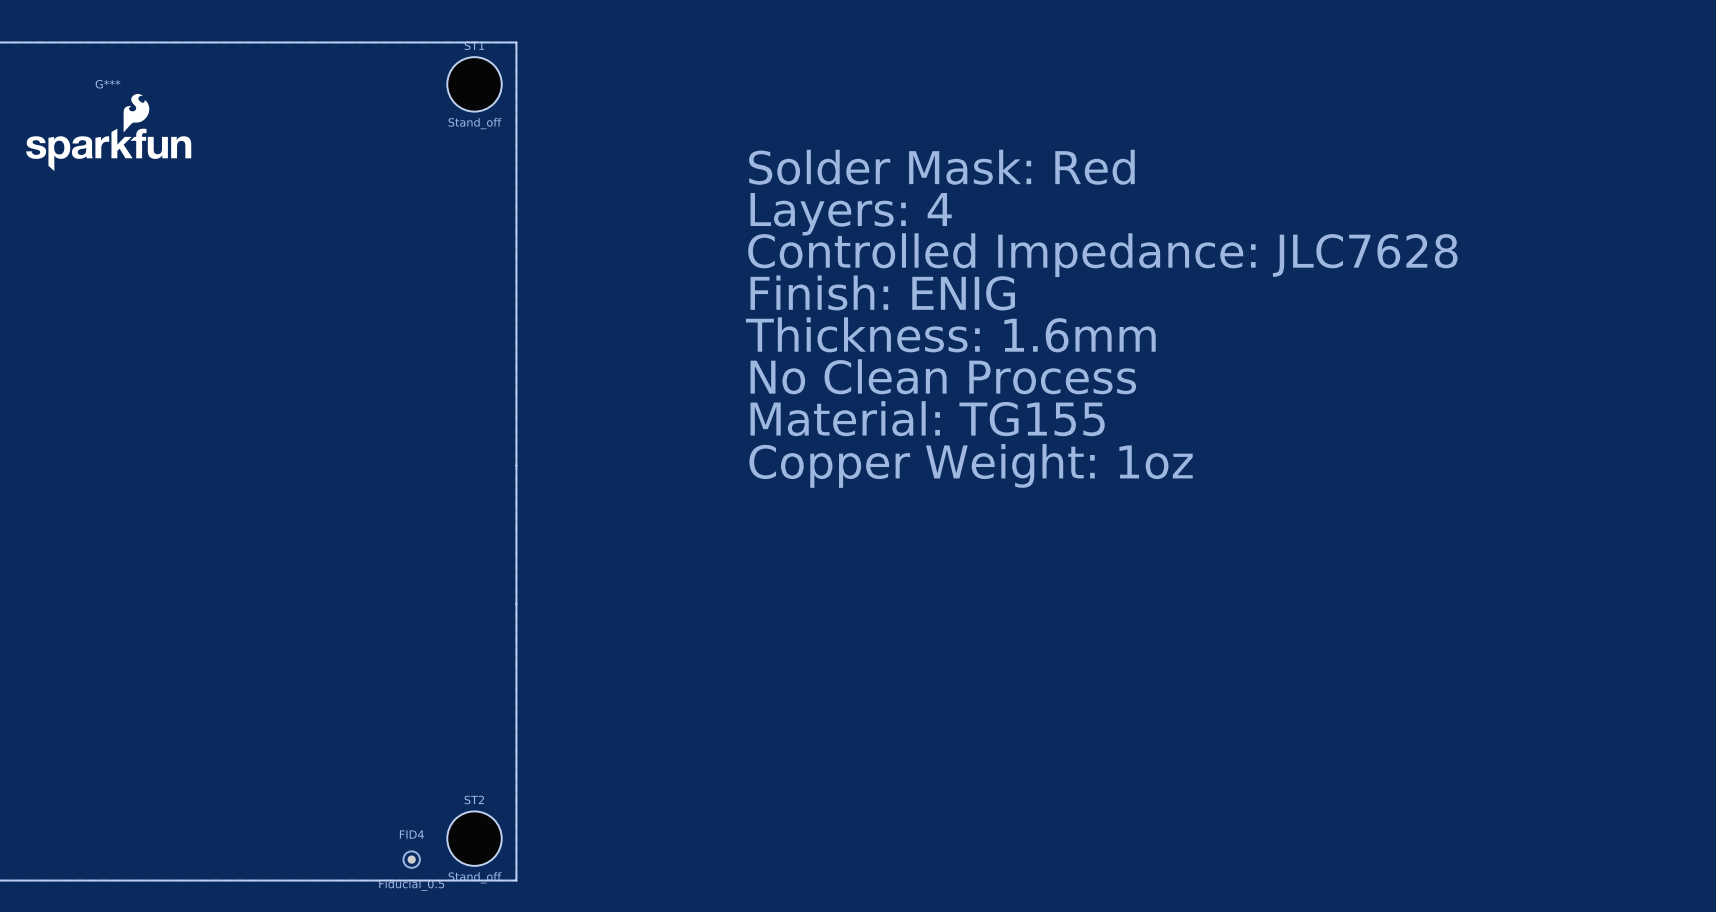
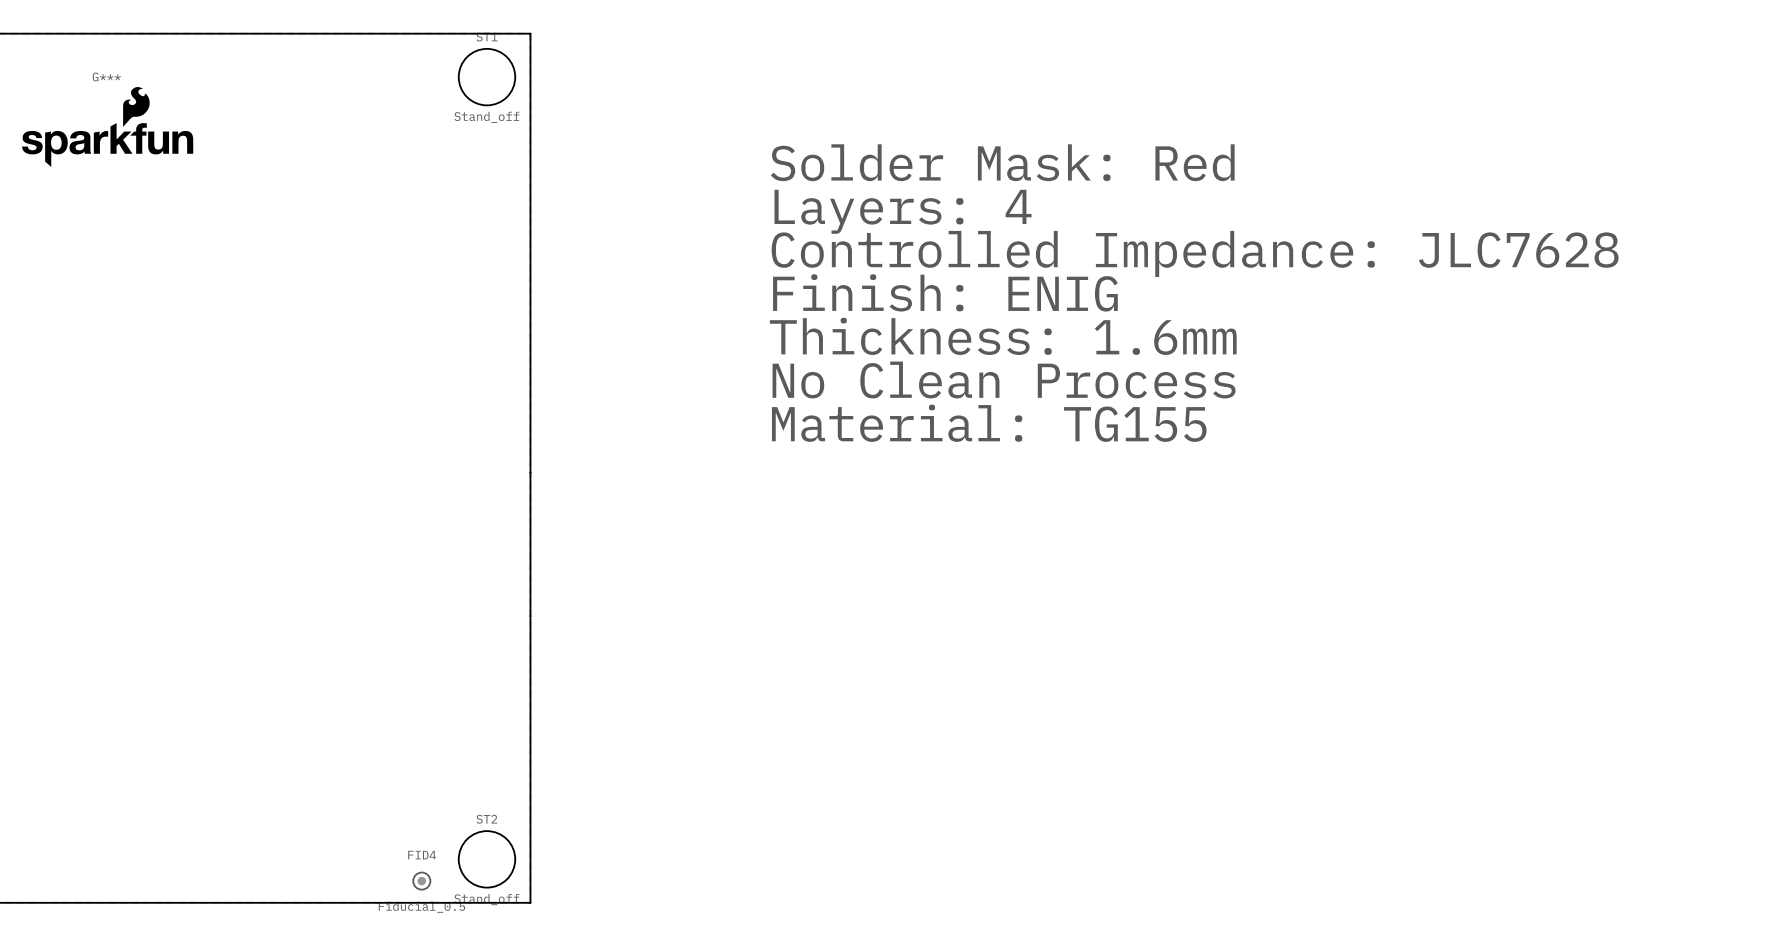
text: Copper Weight: 1oz (971, 465) -> none

